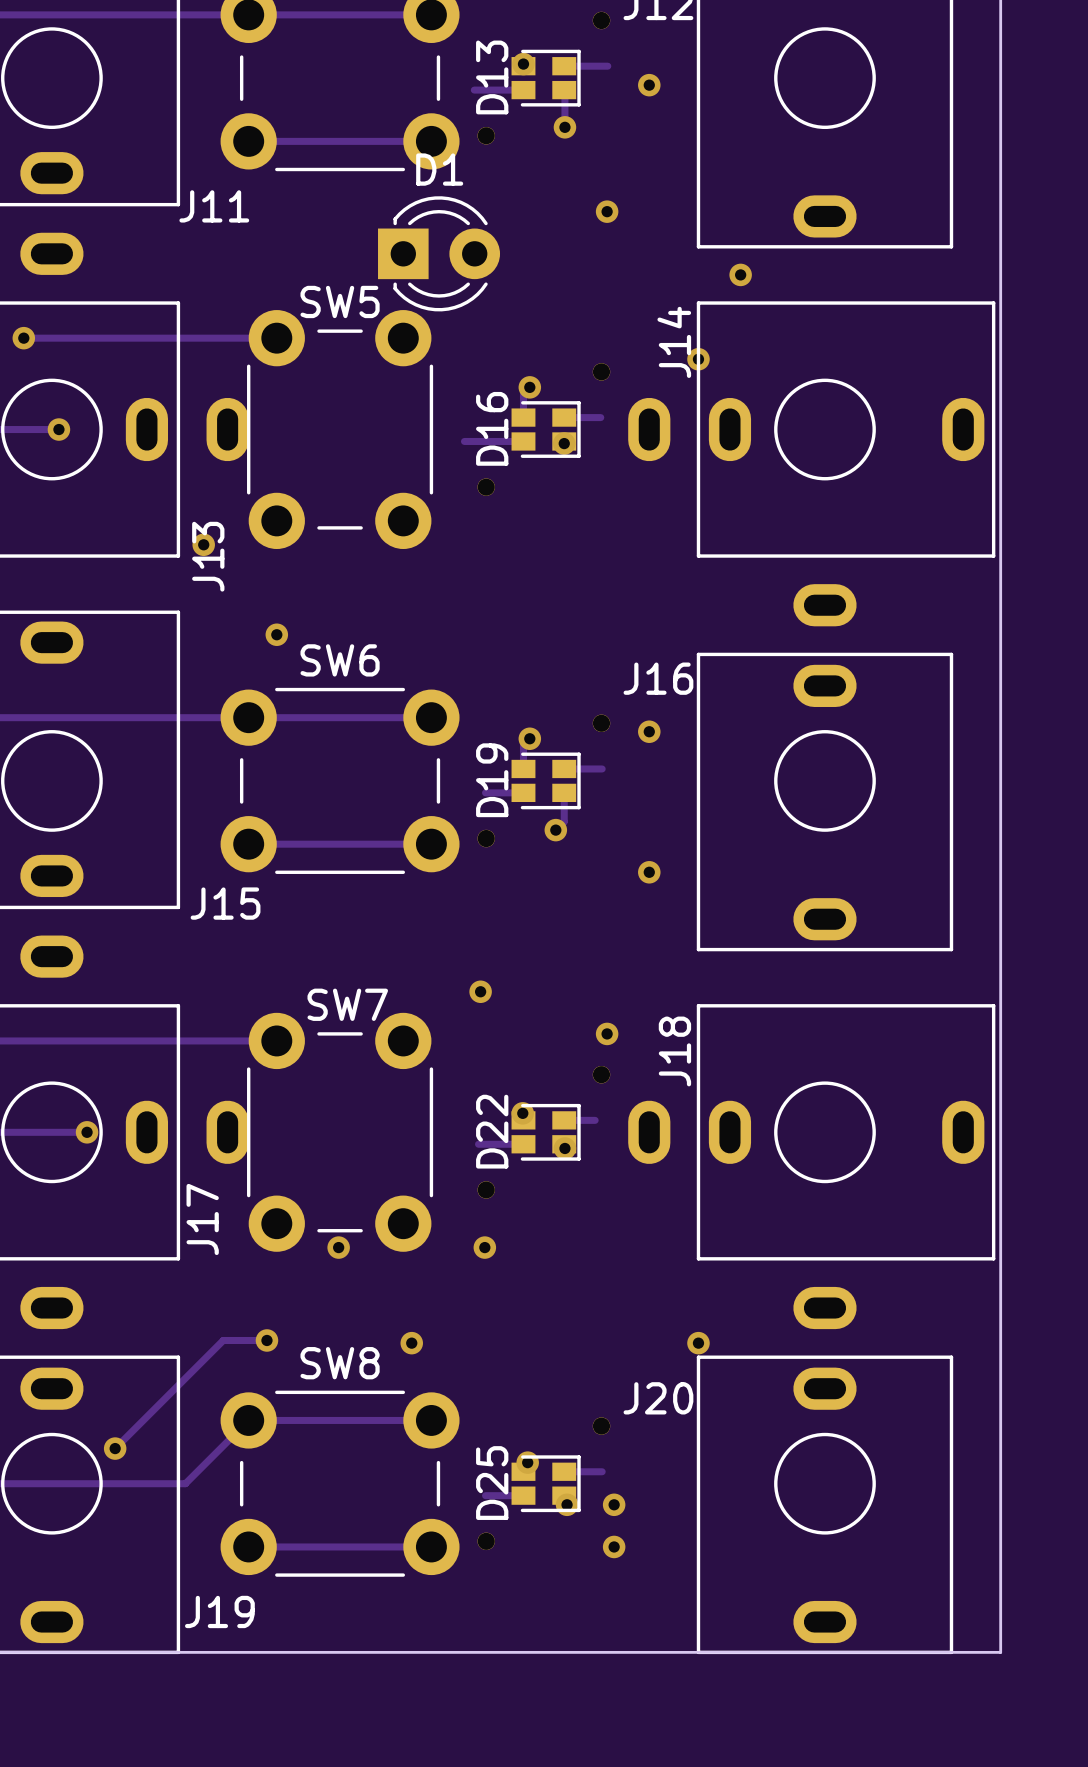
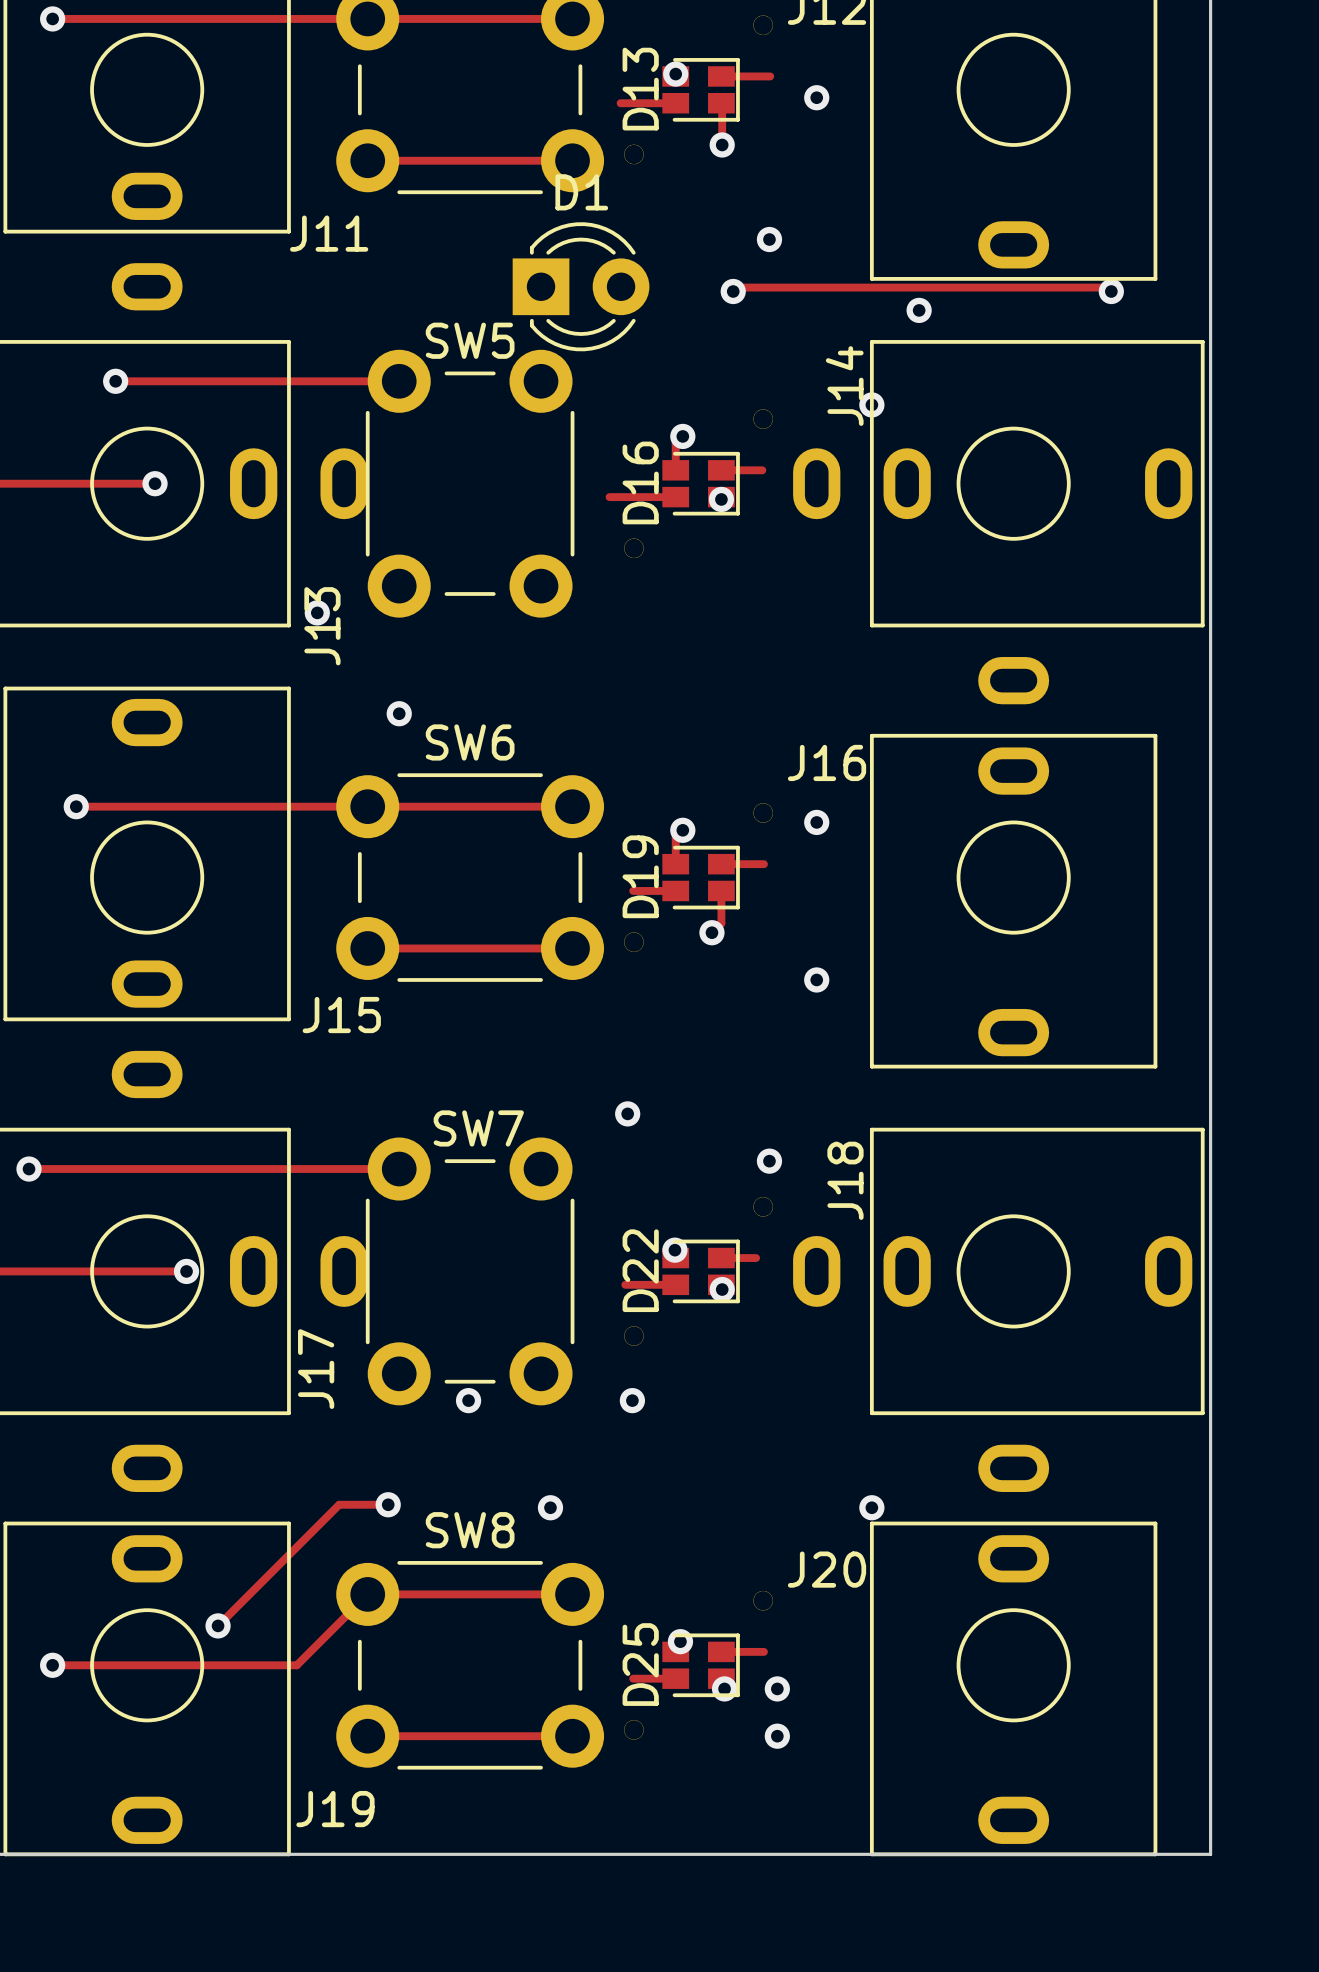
track: none -> (733, 291) (737, 287) (1107, 287) (1111, 291)
via: none -> (733, 291)
via: none -> (1111, 291)

